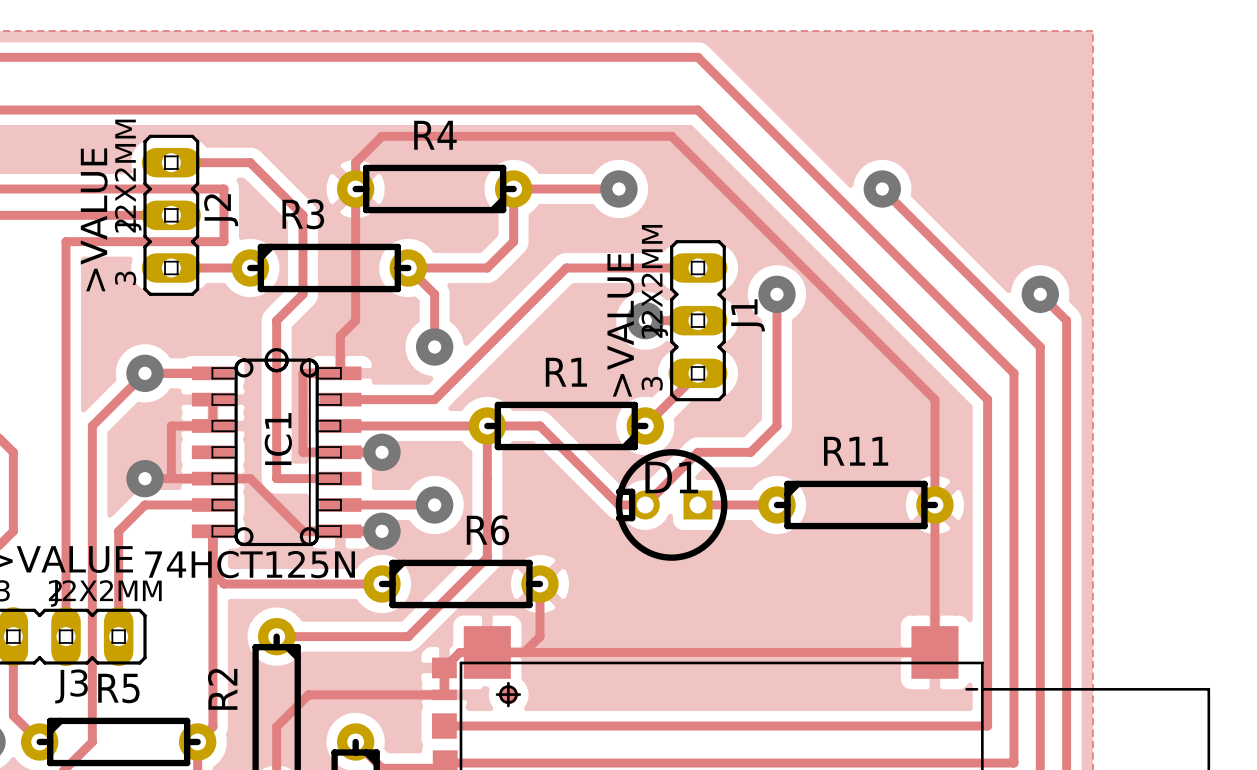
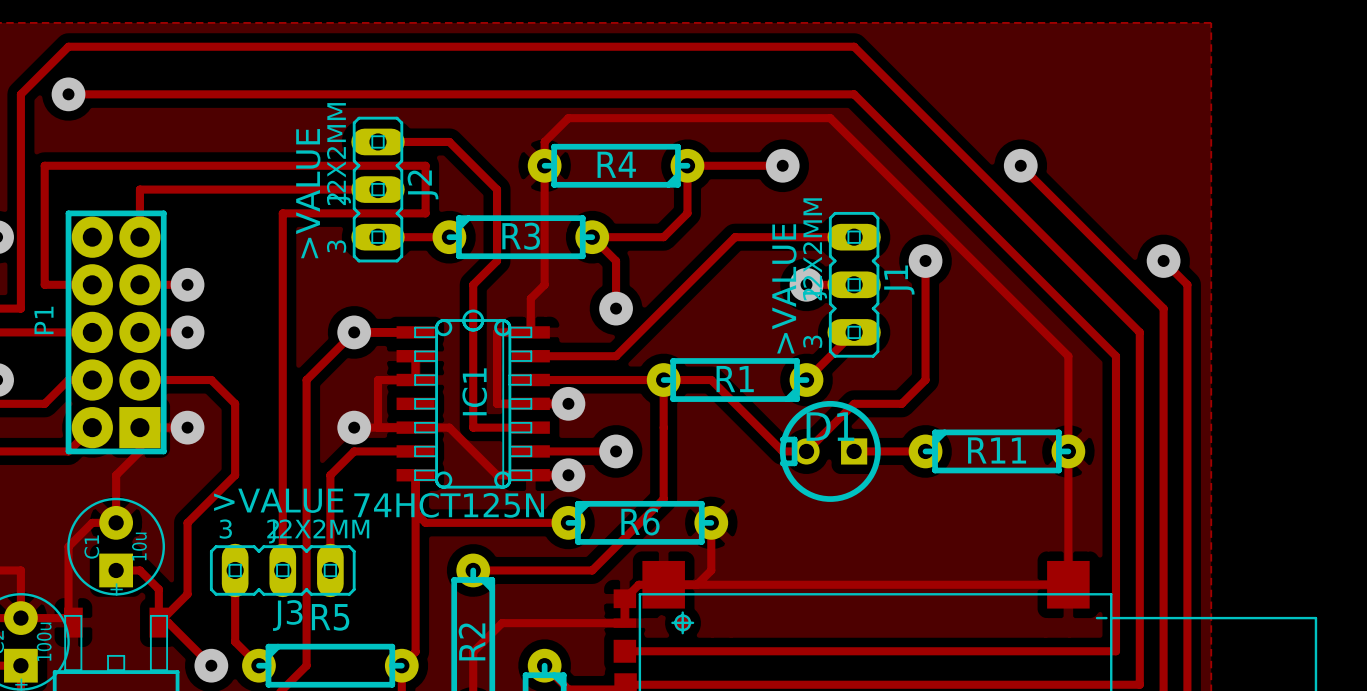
R4 name position: R4 (435, 135) -> R4 (616, 164)
R3 name position: R3 (303, 214) -> R3 (521, 236)
R1 name position: R1 (566, 372) -> R1 (735, 379)
R11 name position: R11 (856, 451) -> R11 (997, 450)
R6 name position: R6 (487, 530) -> R6 (640, 521)
R2 name position: R2 (222, 689) -> R2 (472, 641)

